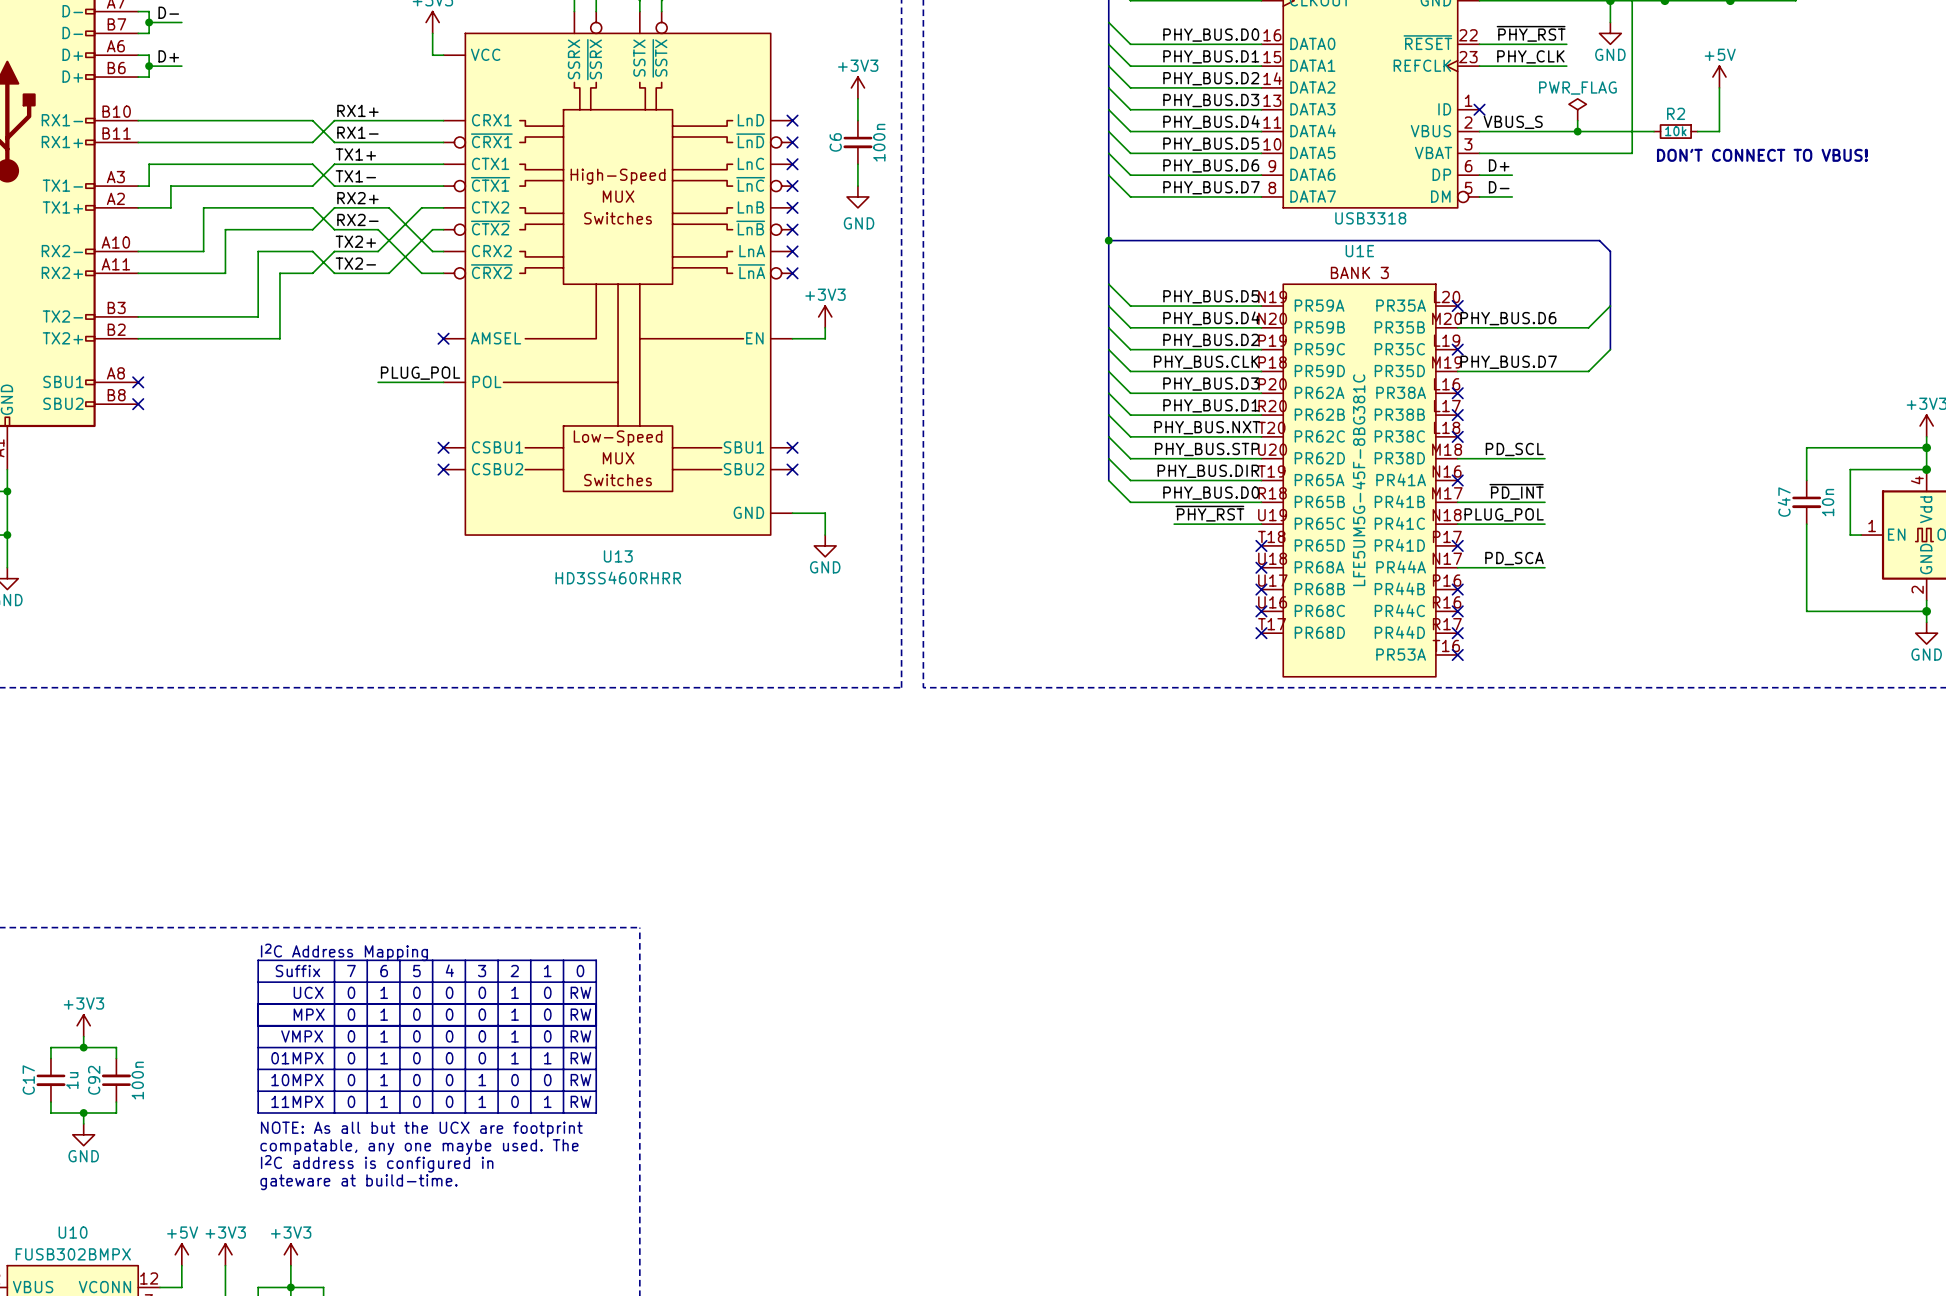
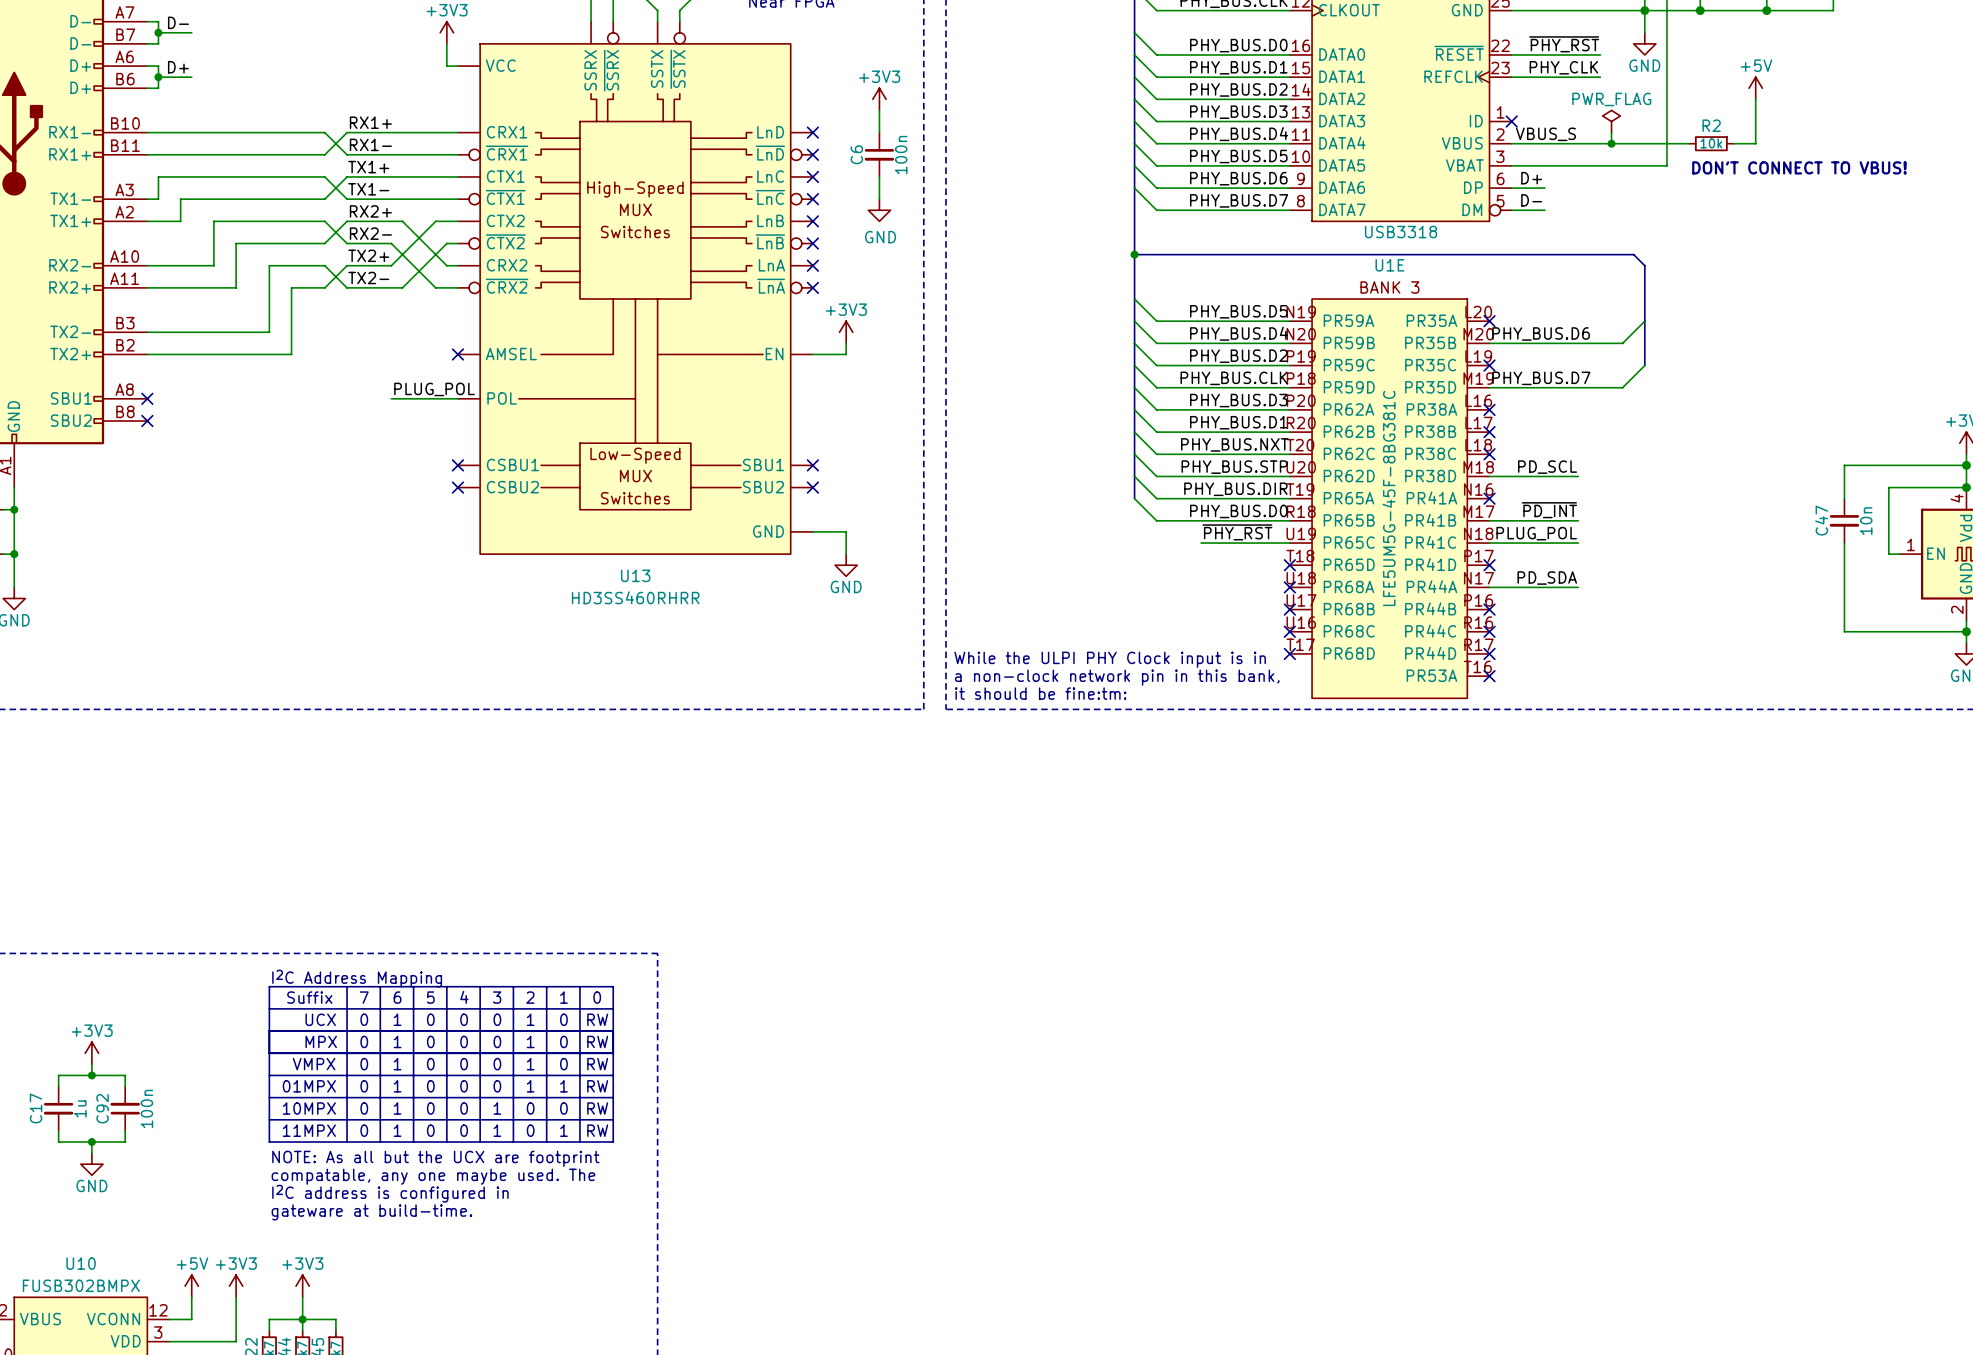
label: PD_SCA (1514, 558) -> PD_SDA (1547, 578)
text: none -> While the ULPI PHY Clock input is in (1110, 659)
text: none -> a non-clock network pin in this bank, (1117, 677)
text: none -> it should be fine:tm: (1040, 693)

